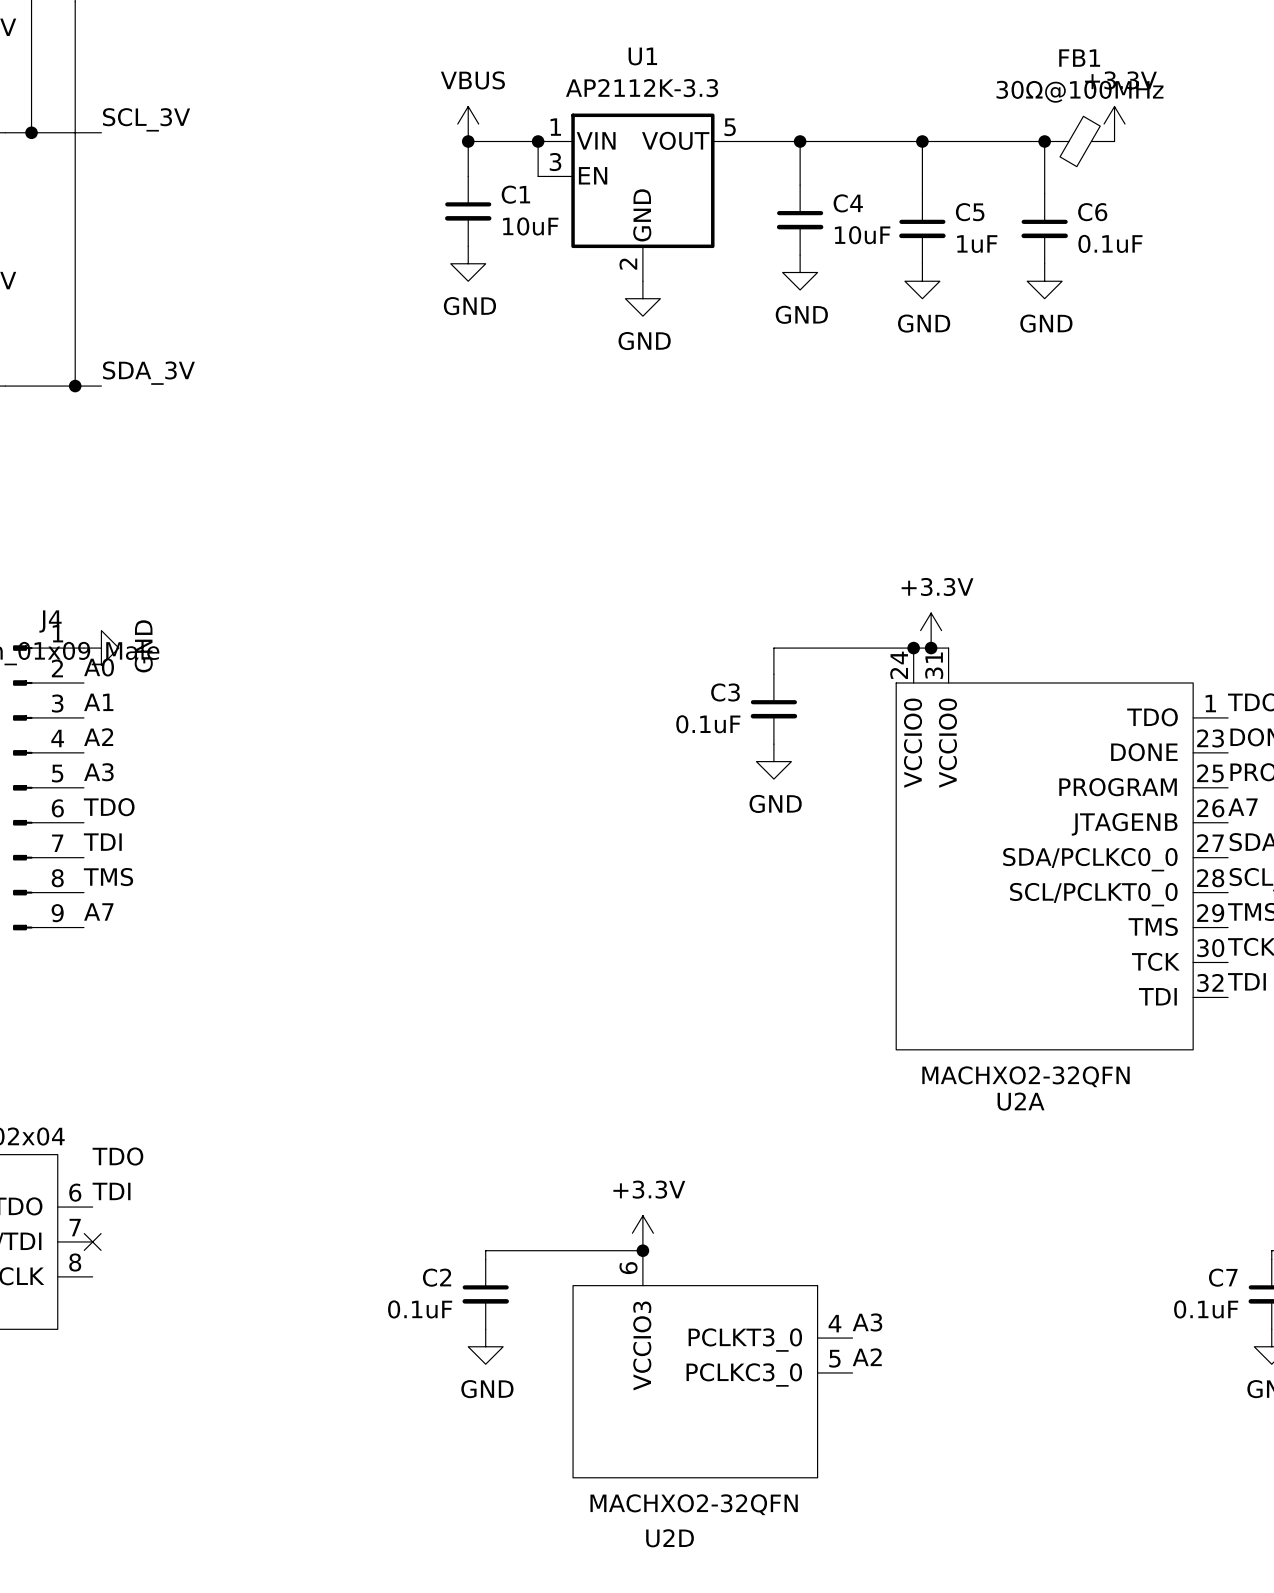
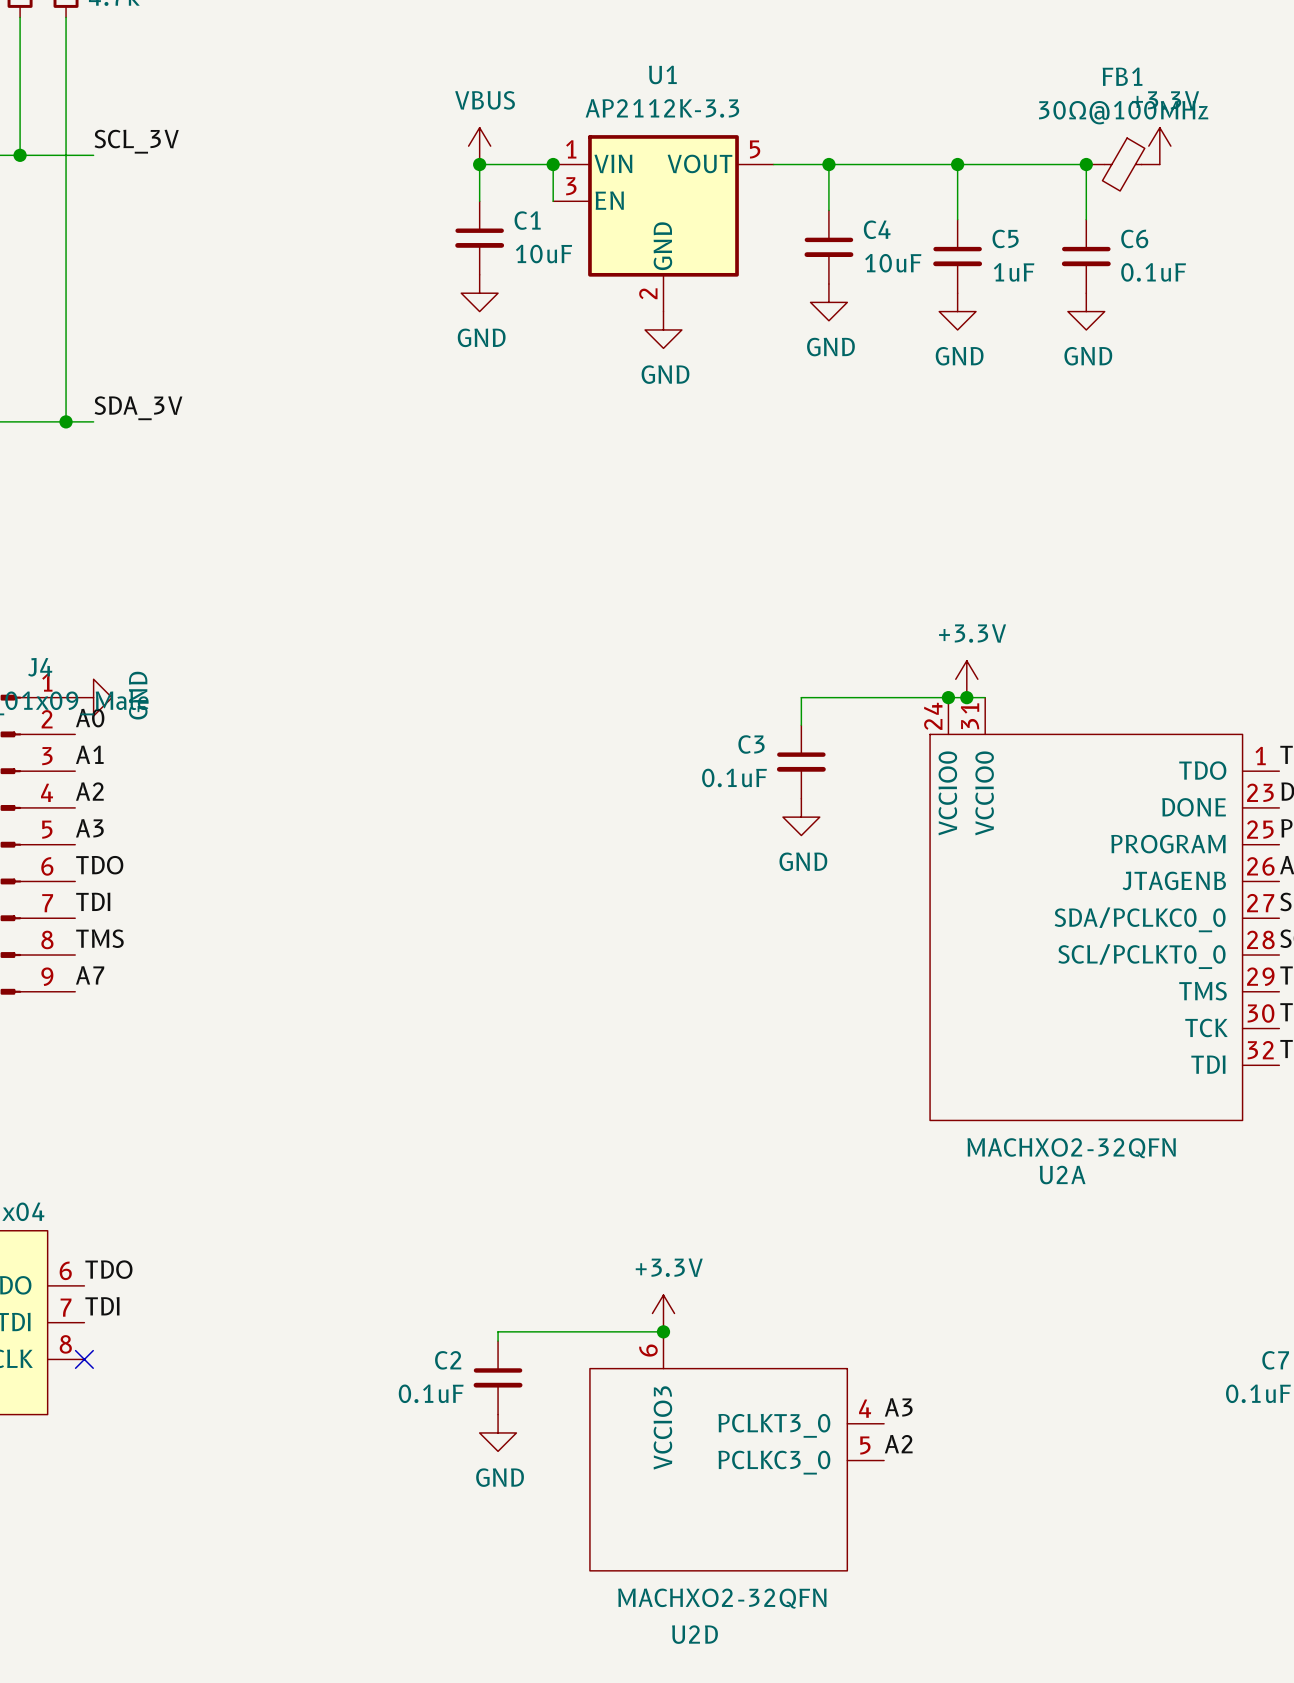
label: TDO (117, 1156) -> none
label: TDI (111, 1191) -> TDO (108, 1269)
label: none -> TDI (102, 1306)
no-connect mark position: (92, 1241) -> (84, 1359)

